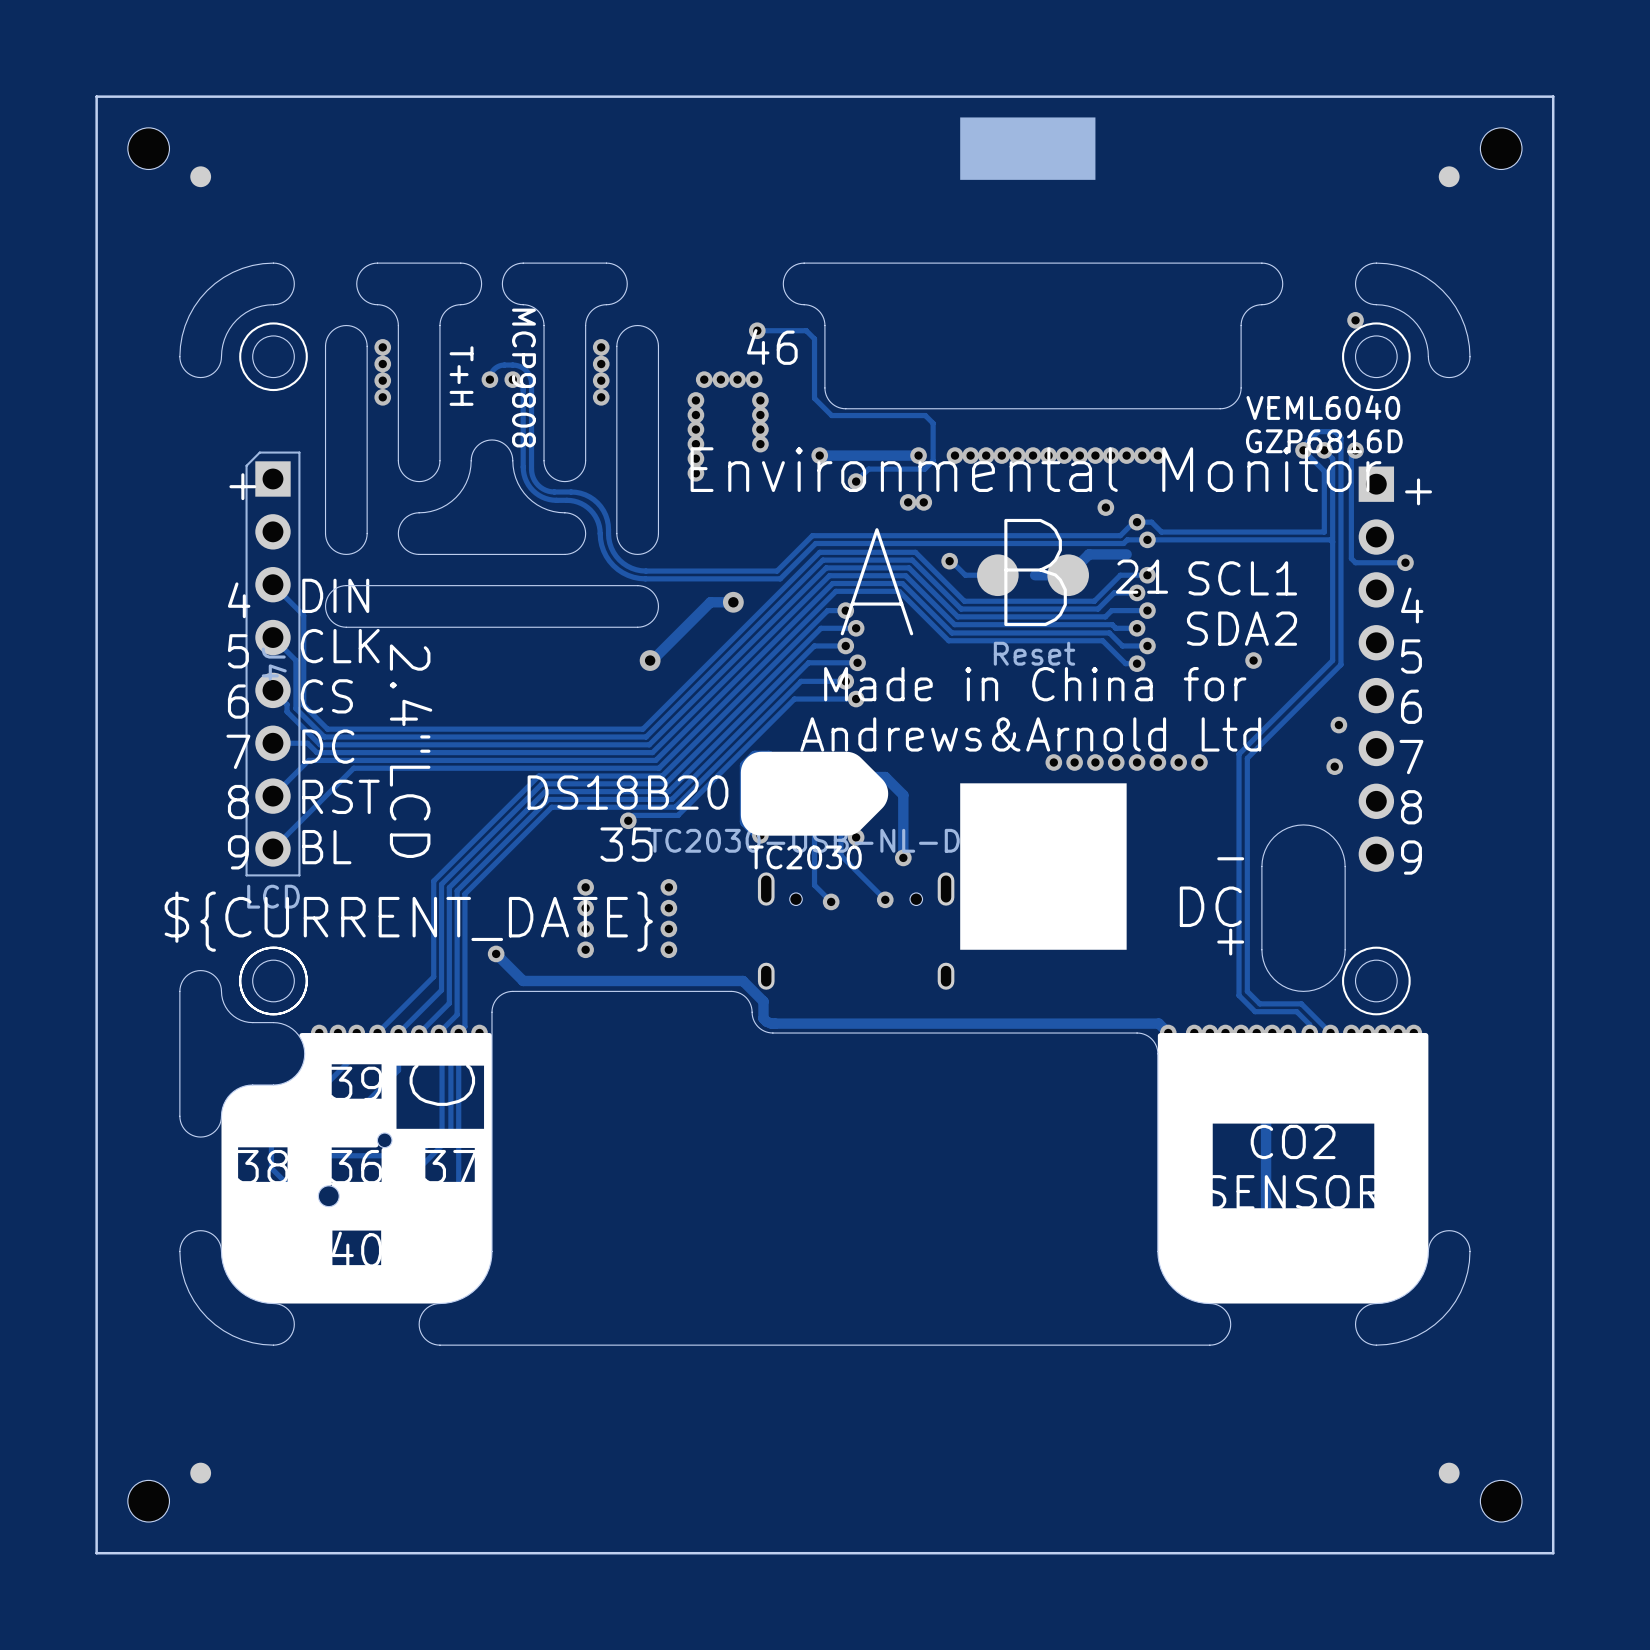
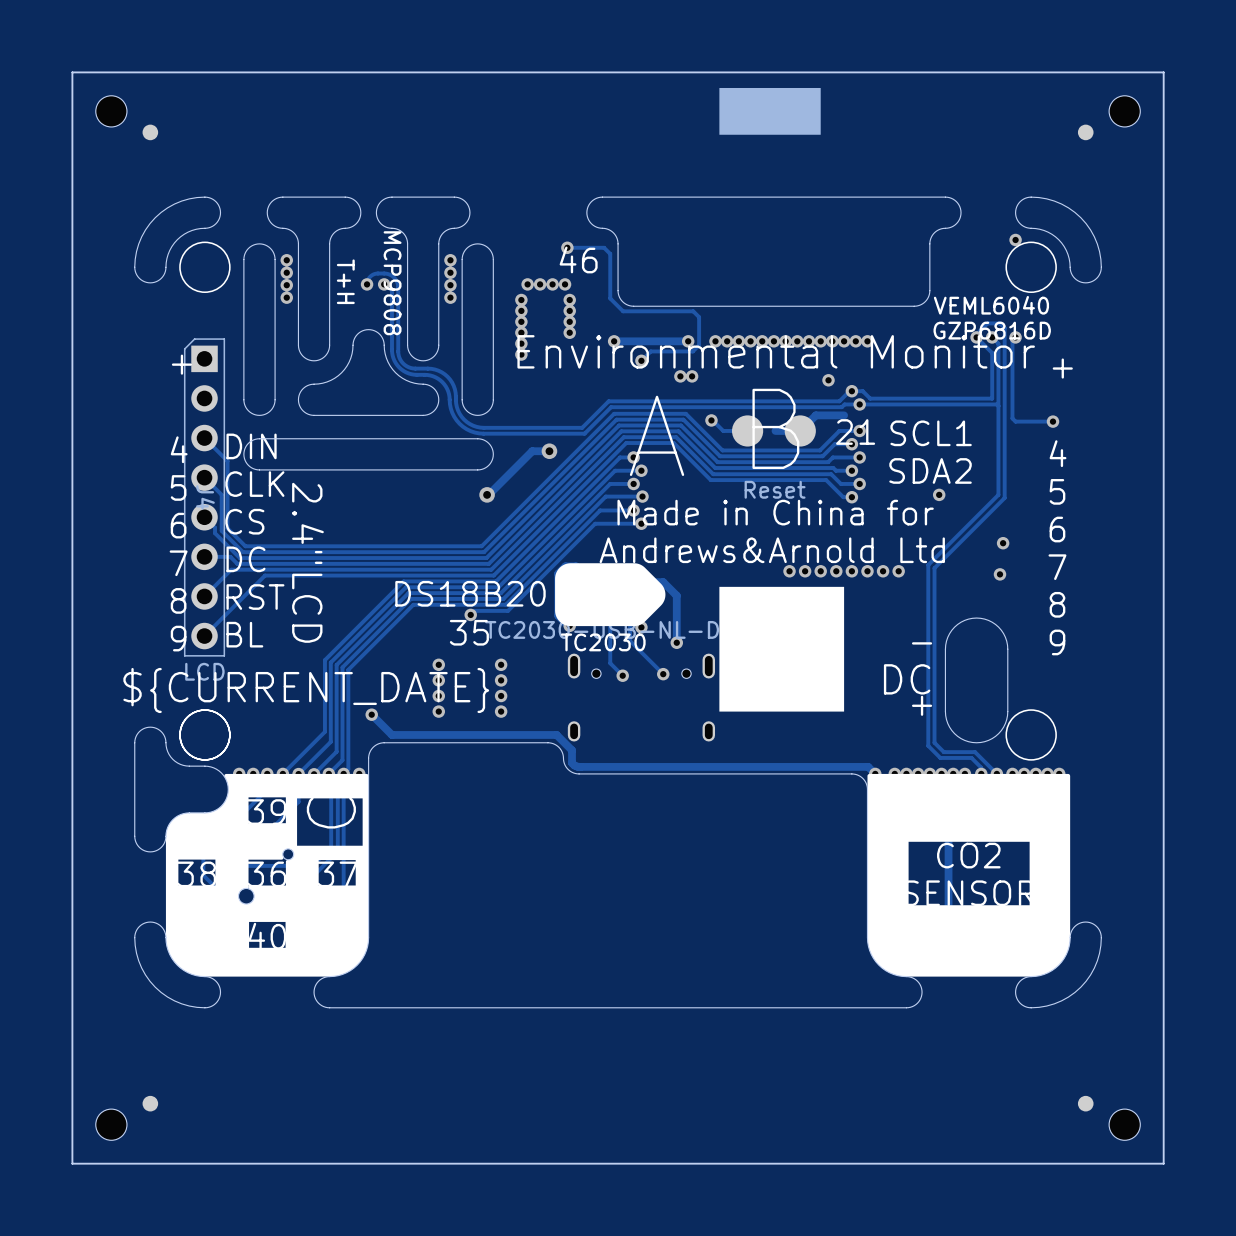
round board edge: [252, 335, 295, 379] -> none
round board edge: [1355, 335, 1398, 379] -> none
part: (1376, 669) -> none
round board edge: [252, 959, 295, 1003] -> none
round board edge: [1355, 959, 1398, 1003] -> none

